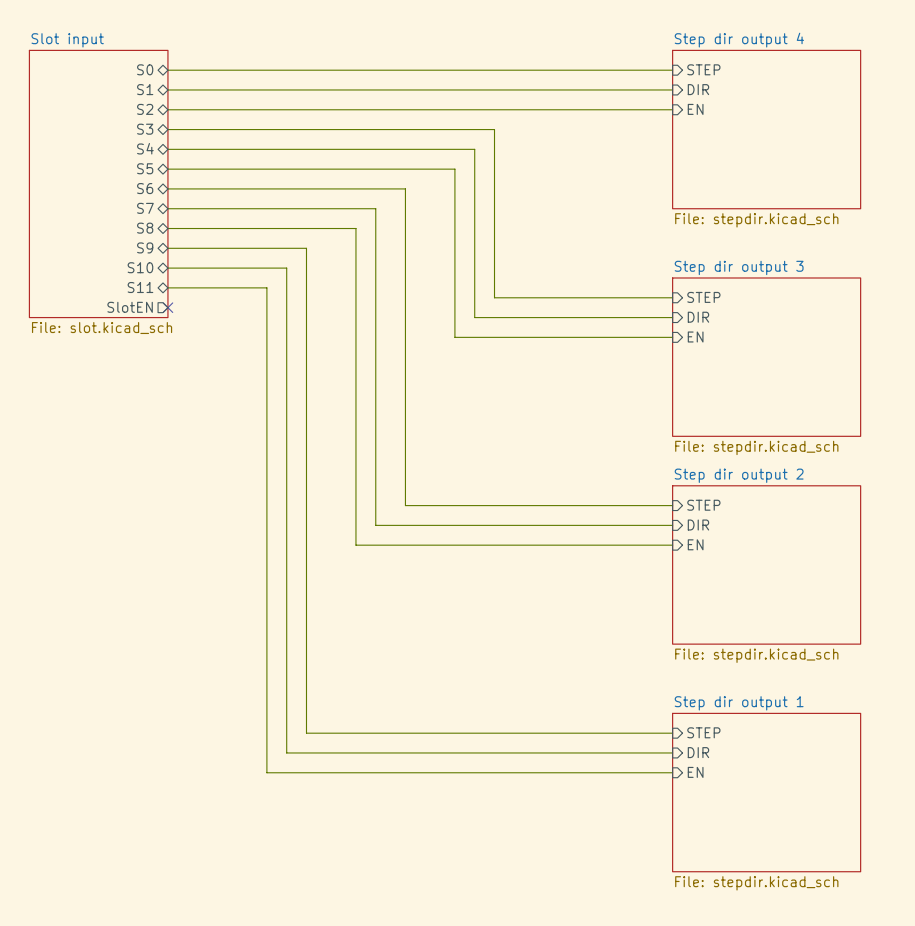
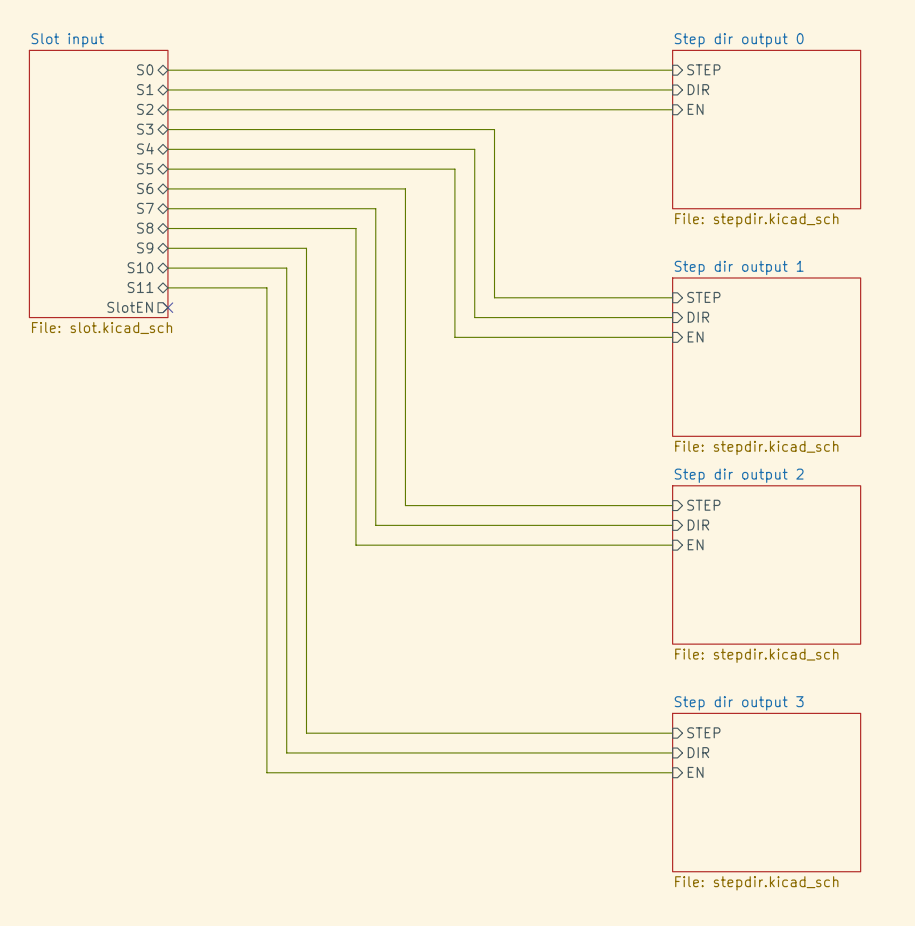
sheet Step dir output 4 name: Step dir output 4 (739, 40) -> Step dir output 0 (739, 40)
sheet Step dir output 3 name: Step dir output 3 (739, 267) -> Step dir output 1 (739, 267)
sheet Step dir output 1 name: Step dir output 1 (739, 703) -> Step dir output 3 (739, 703)

